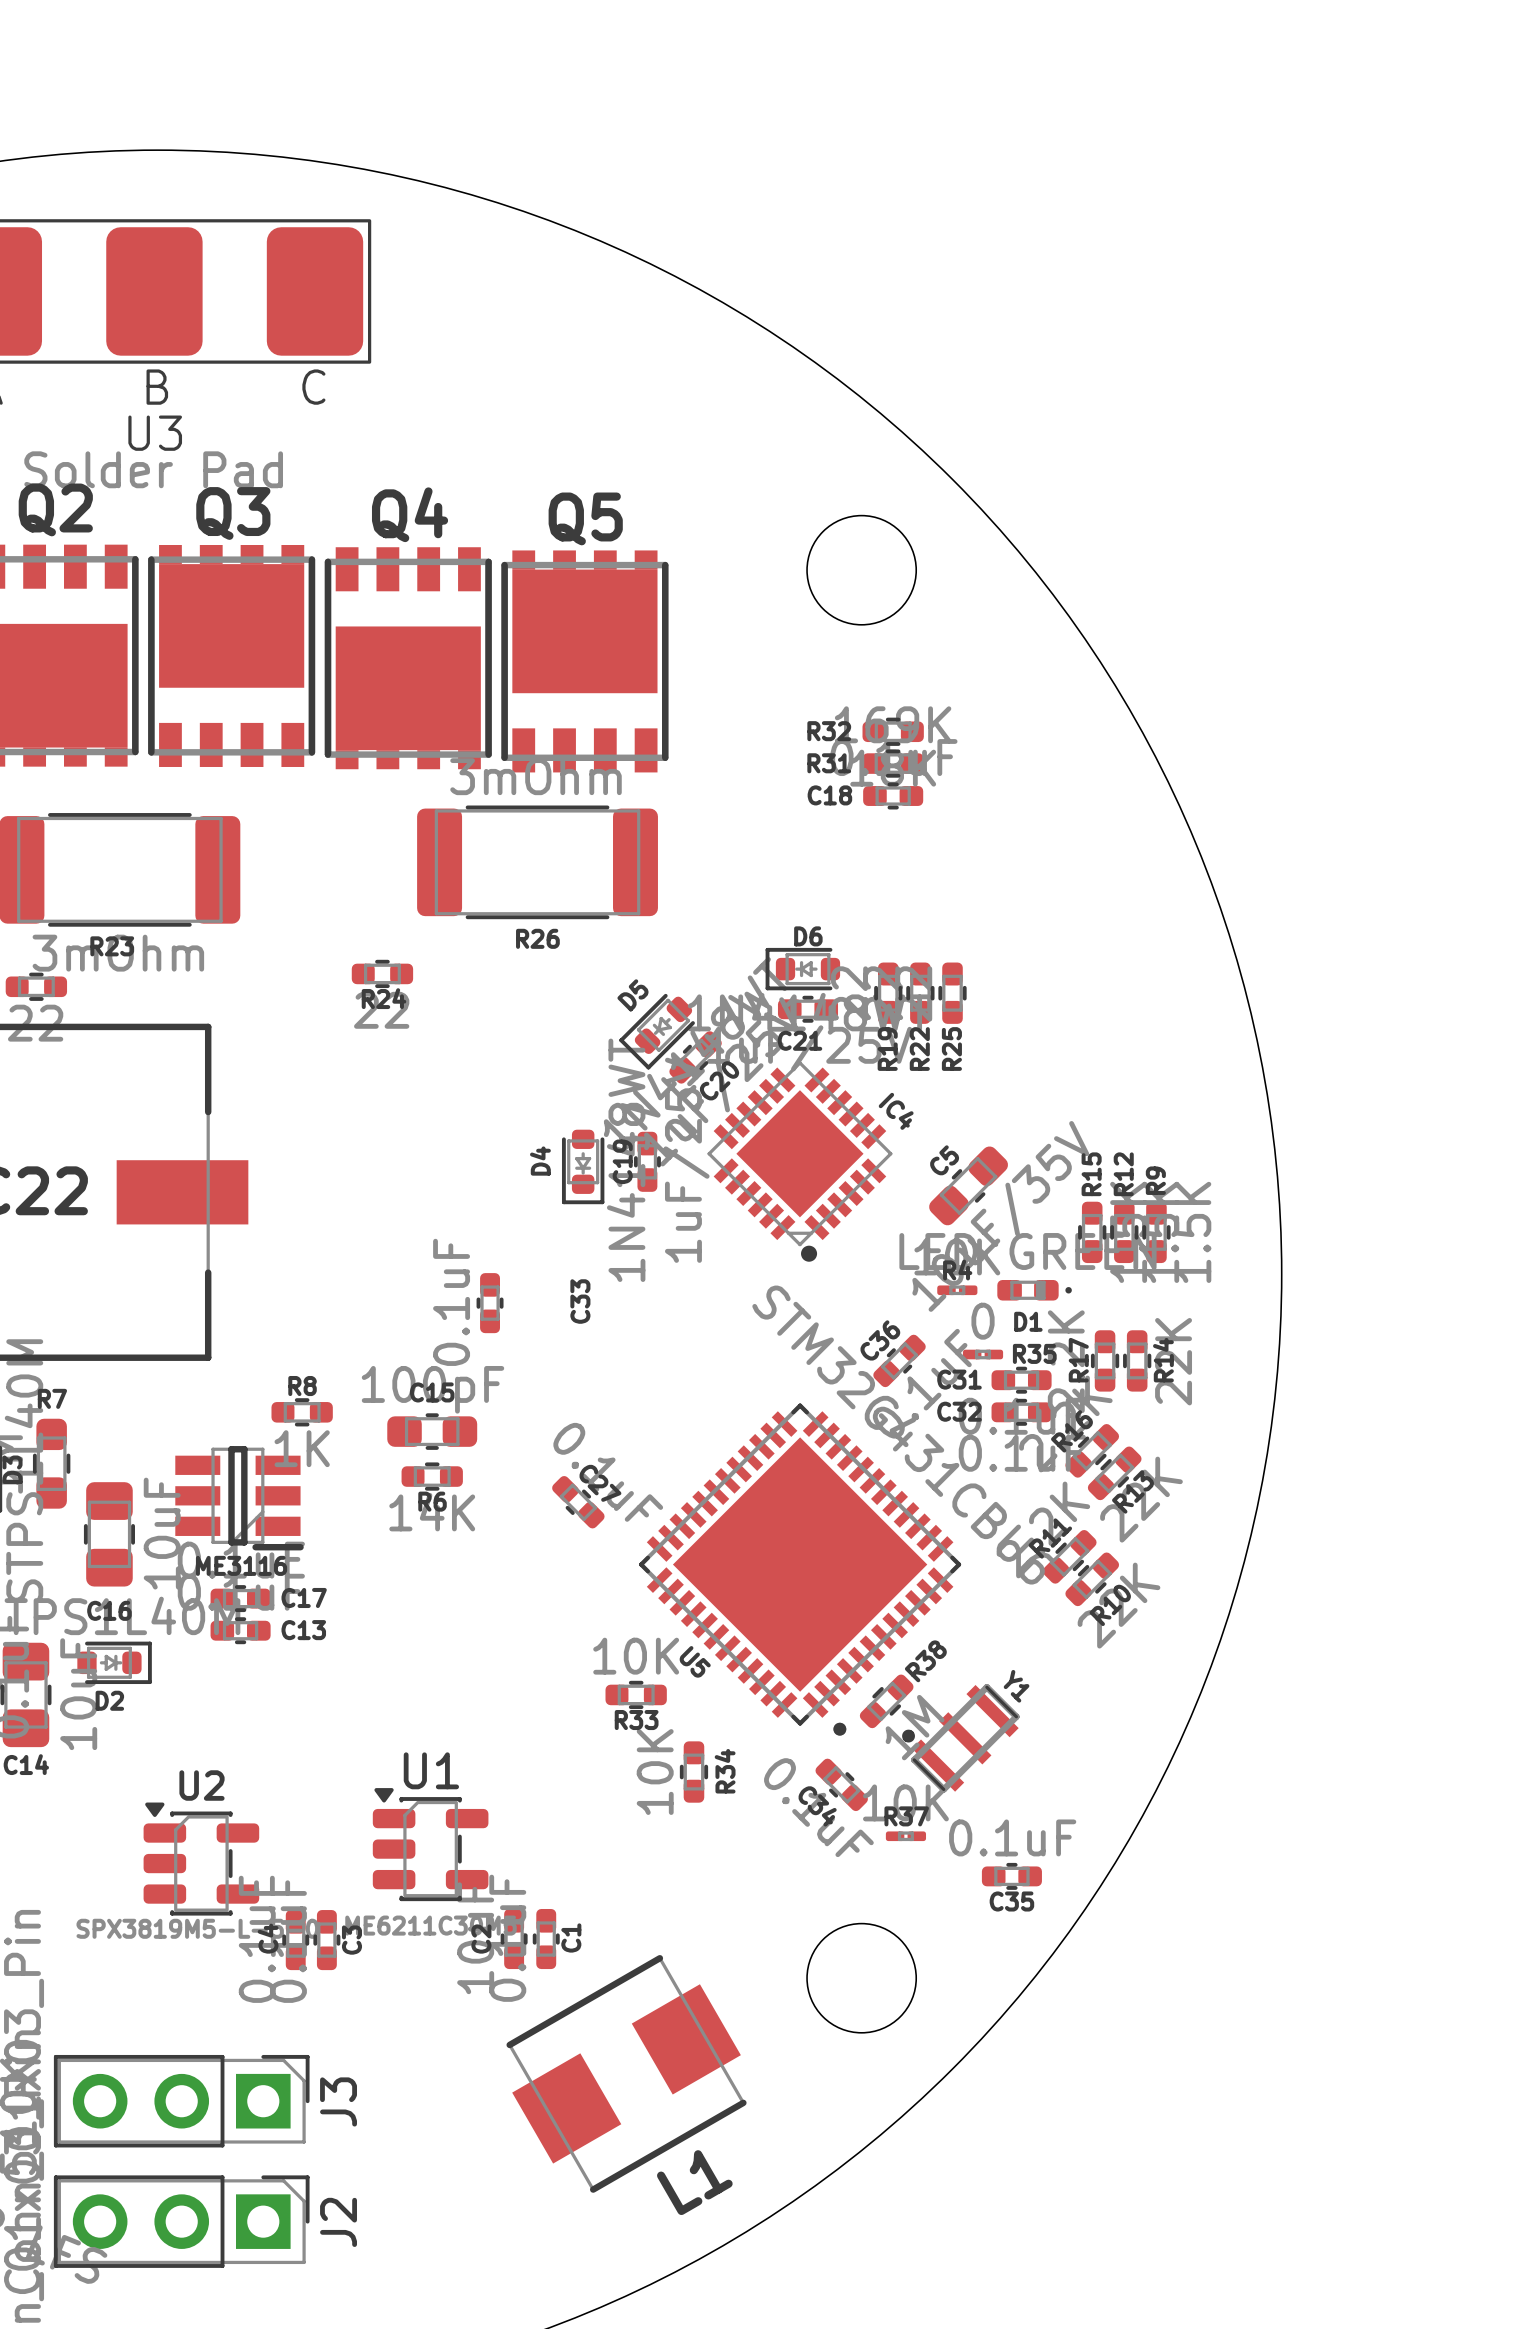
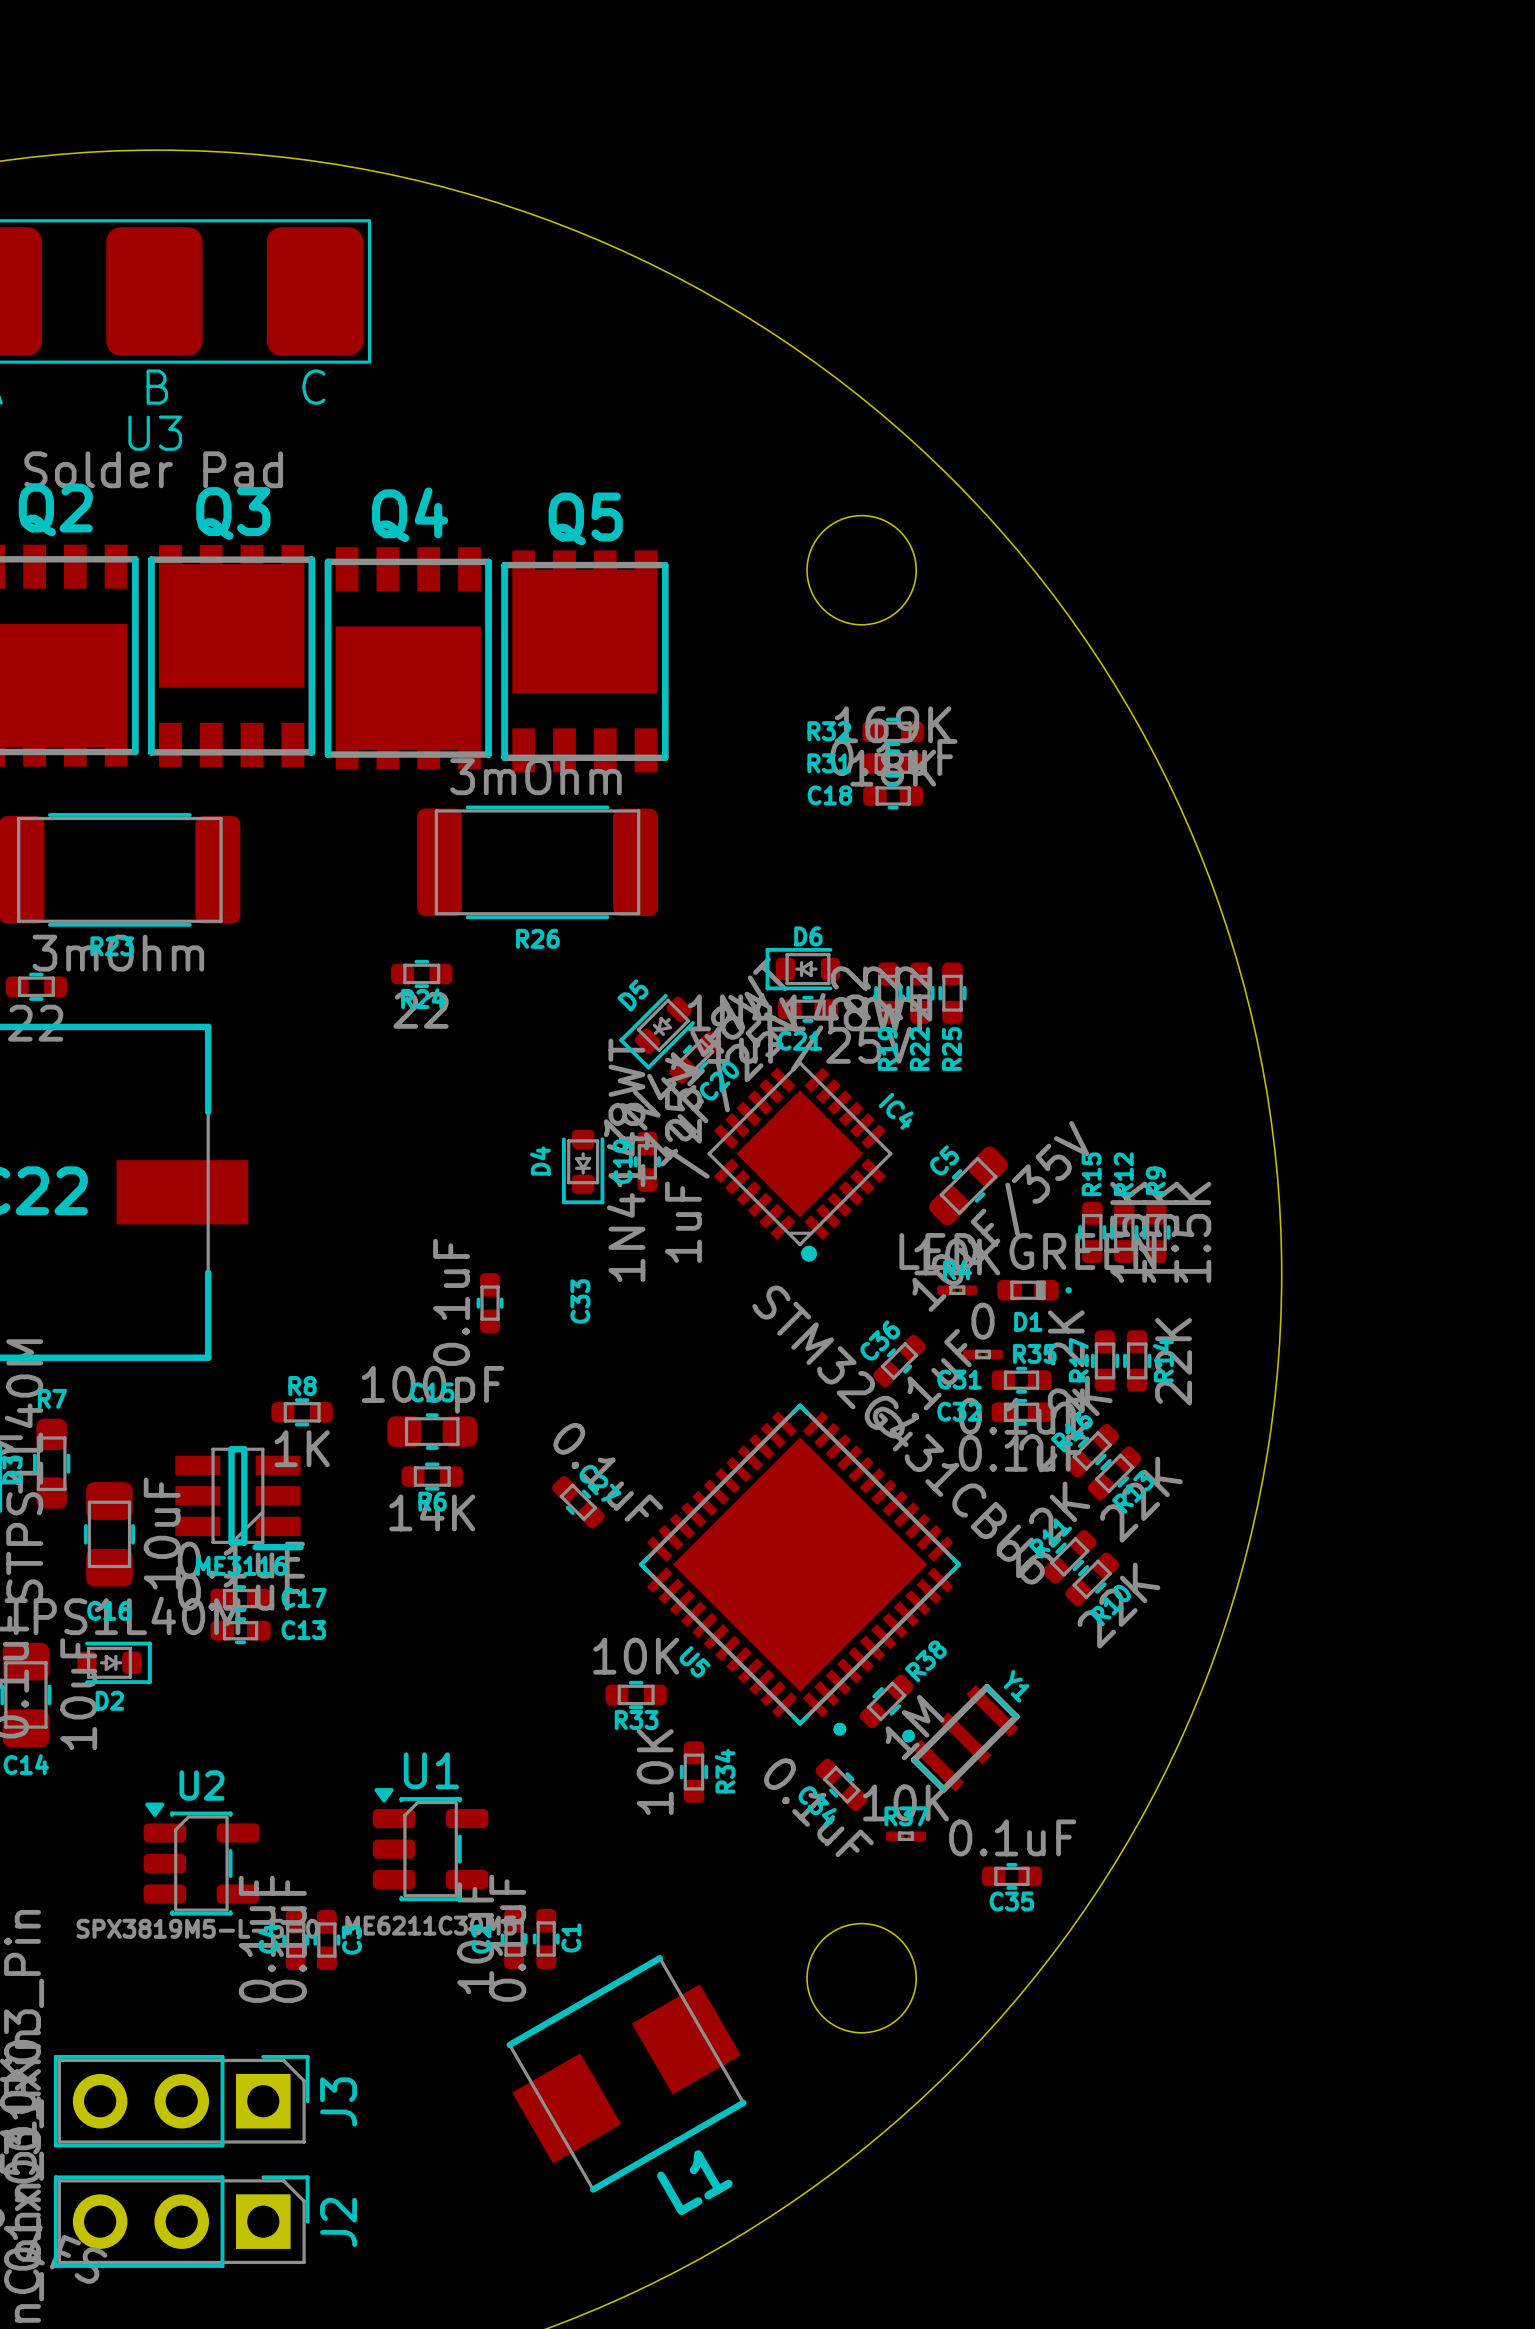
R24 position: (382, 973) -> (421, 973)

